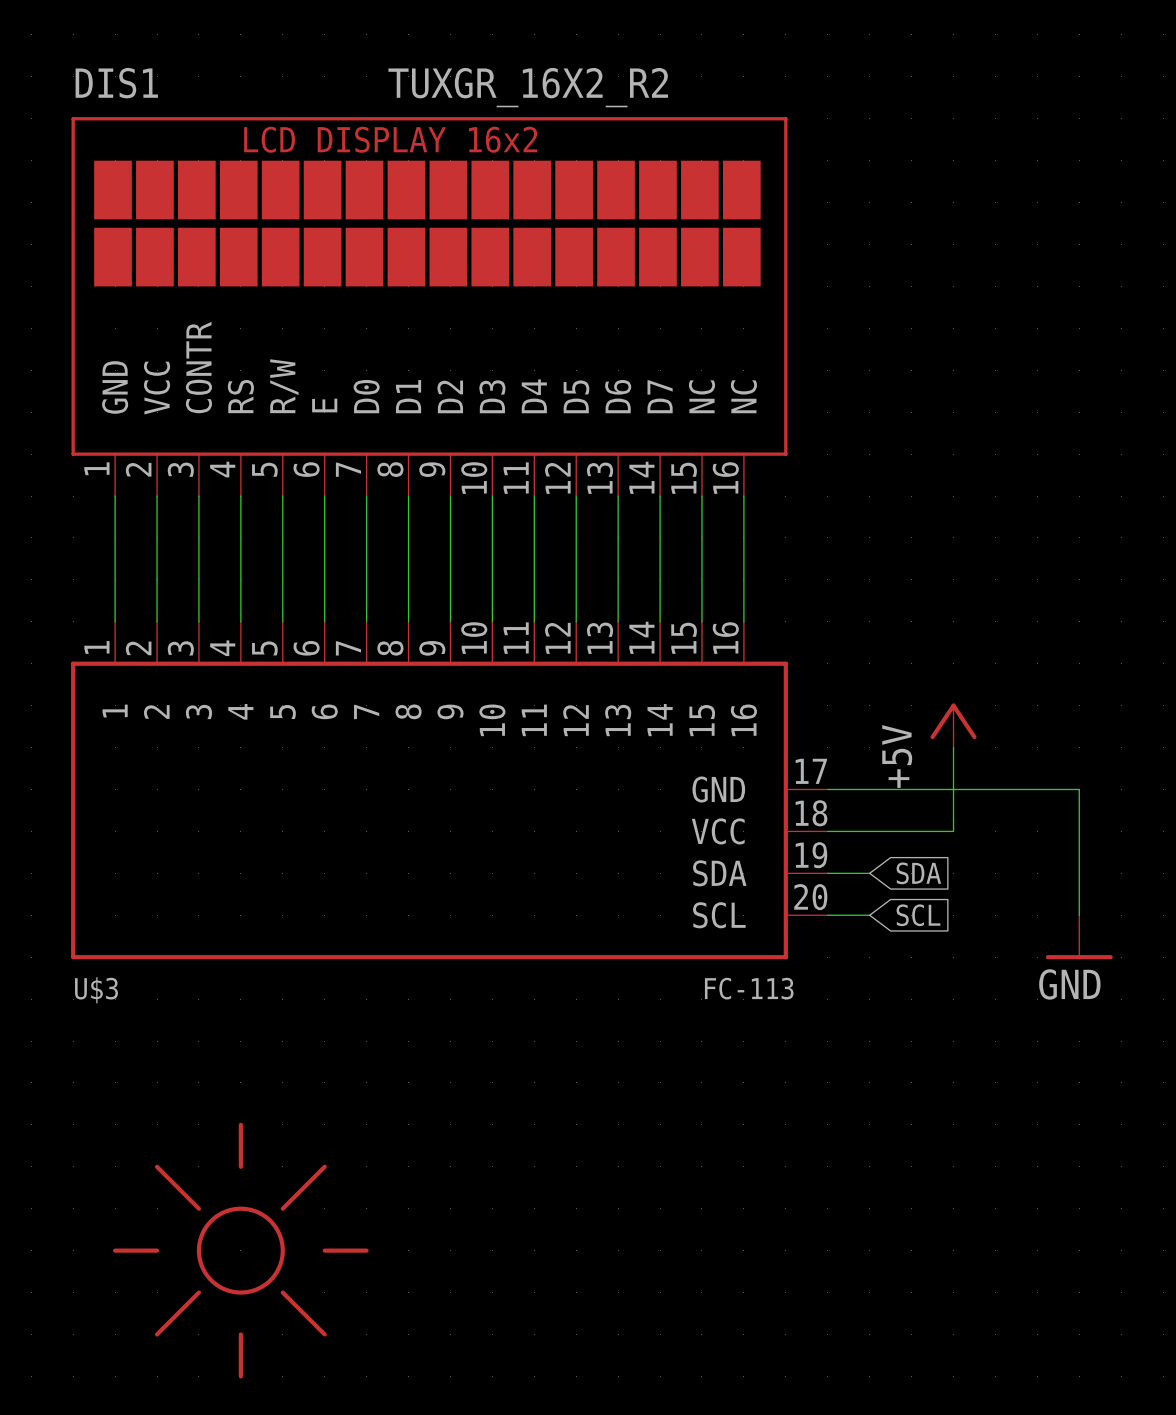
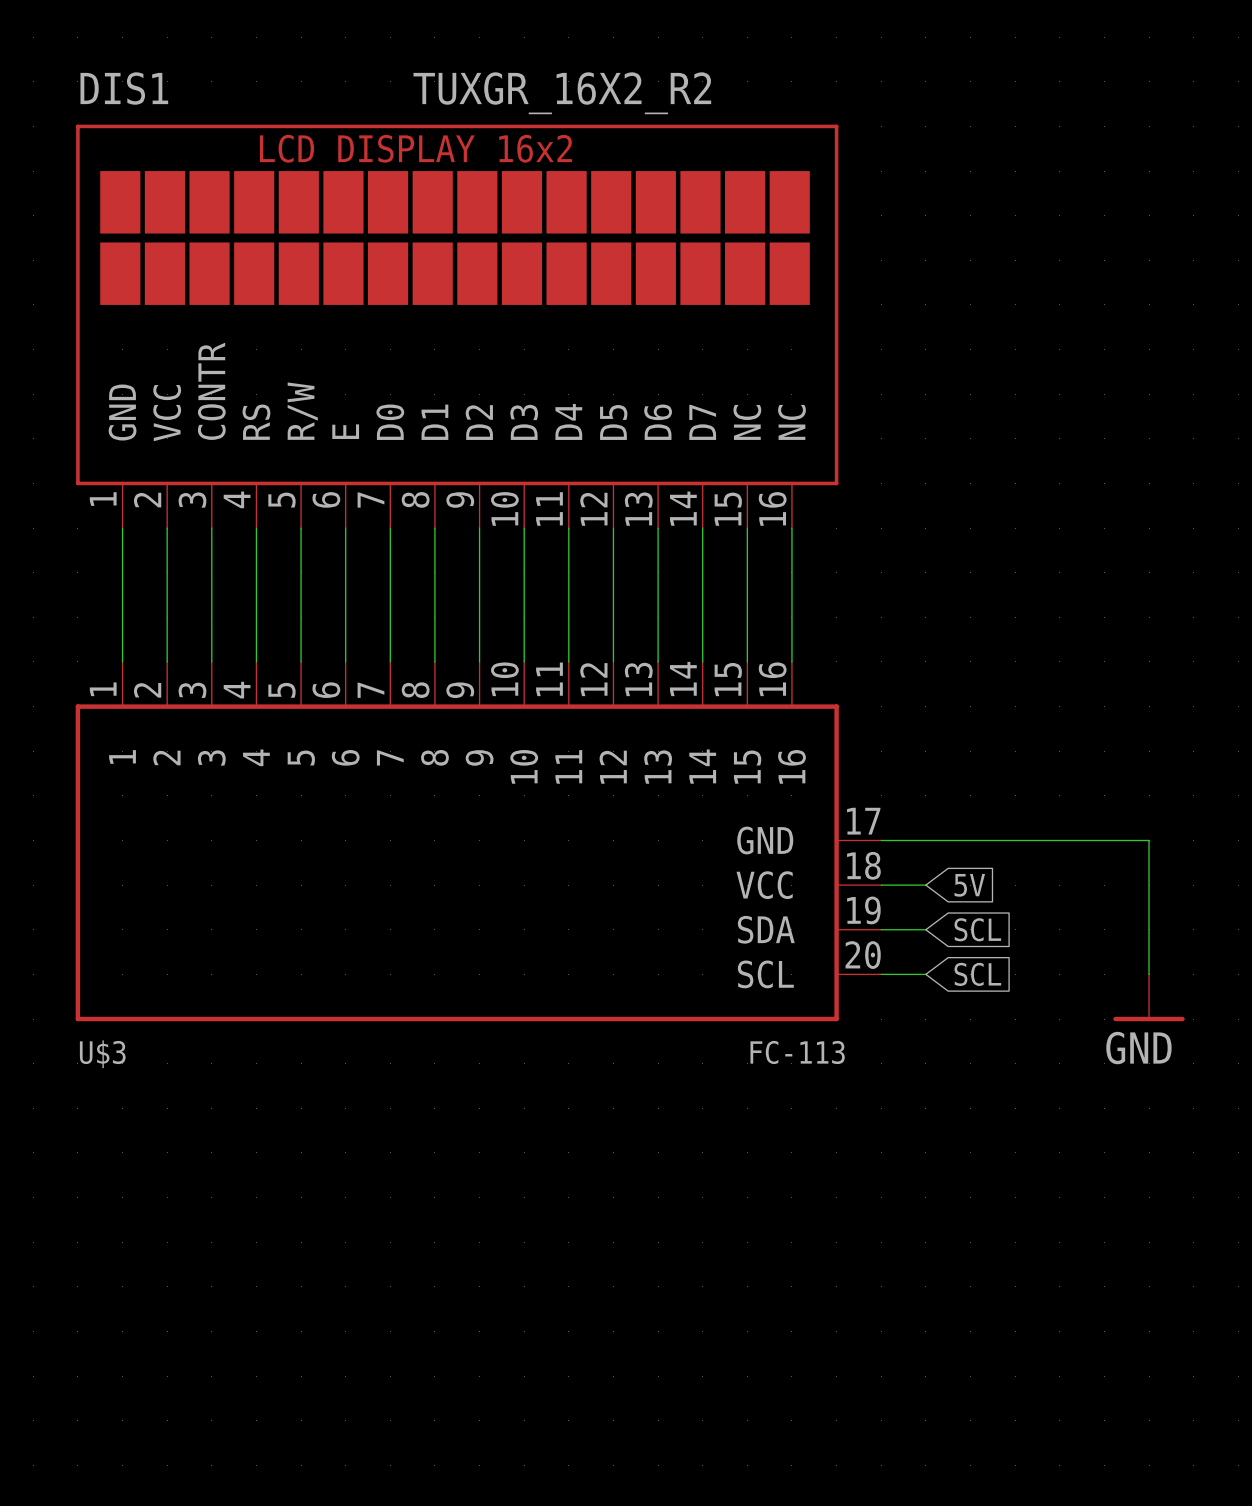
power symbol: +5V (953, 725) -> none
wire: (953, 747) (953, 831) (869, 831) -> none
global label: none -> 5V (969, 885)
global label: SDA (918, 873) -> SCL (977, 929)
part: (240, 1250) -> none

